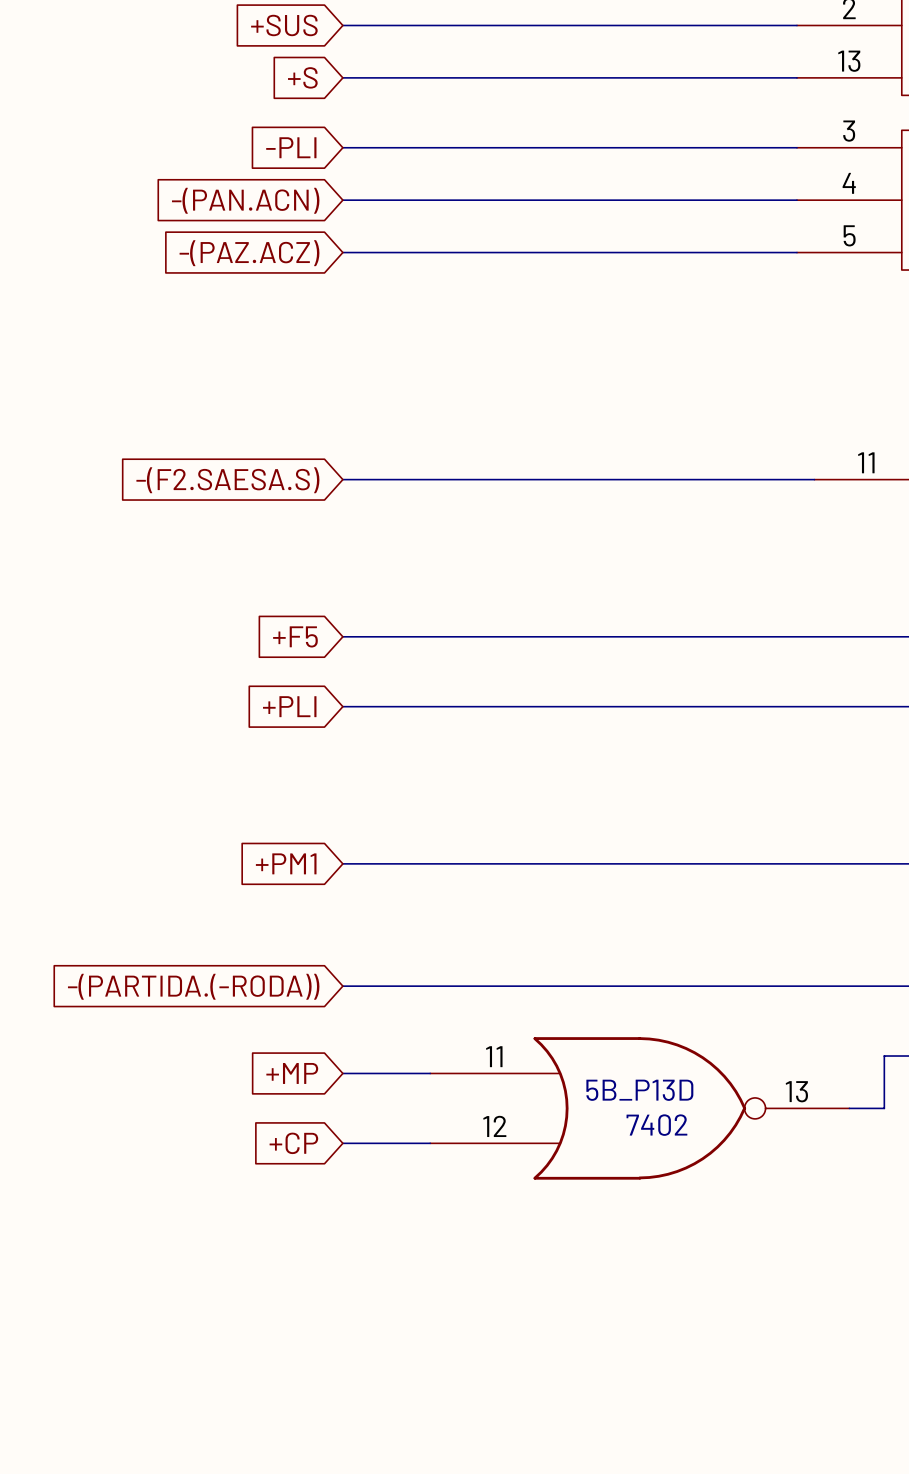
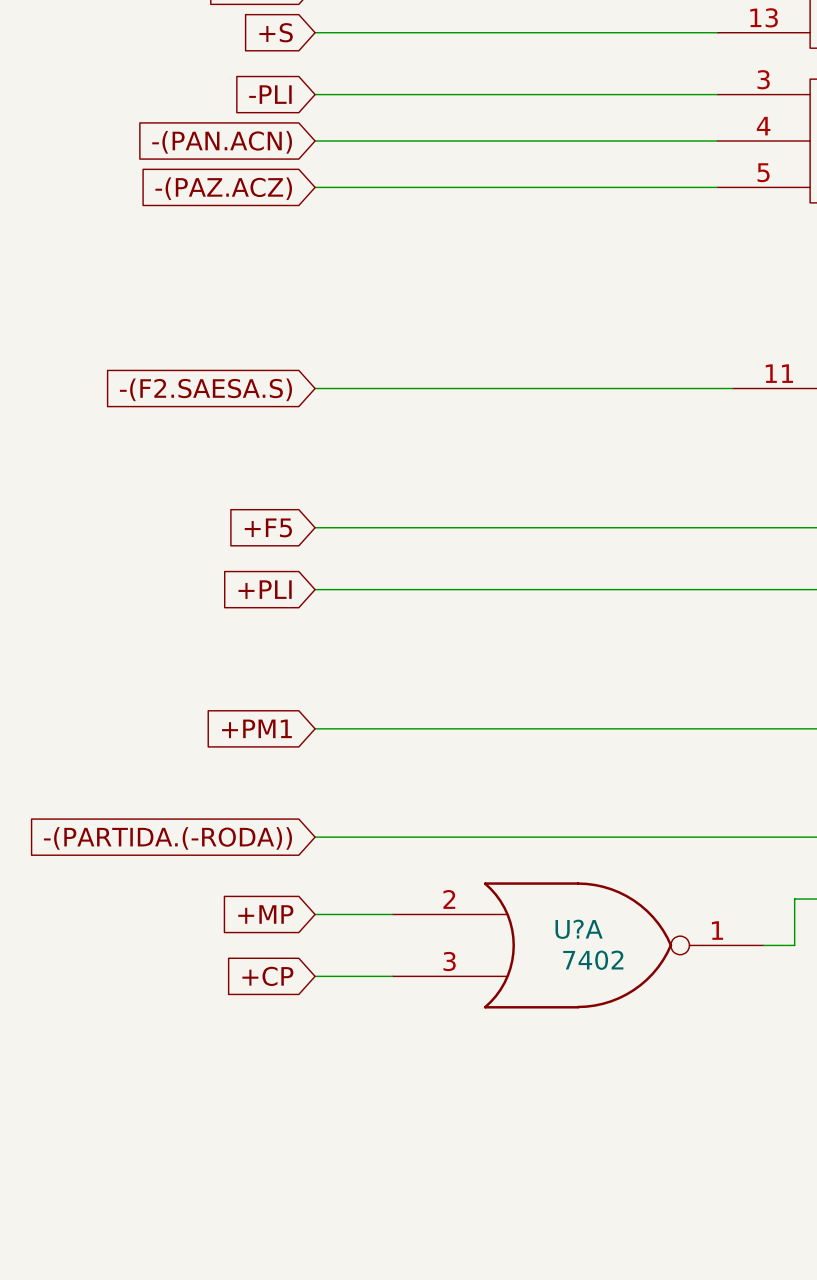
5B_P13D pin number: 11 (494, 1056) -> 2 (449, 899)
5B_P13D name: 5B_P13D (639, 1090) -> U?A (579, 929)
5B_P13D pin number: 13 (796, 1091) -> 1 (717, 930)
5B_P13D pin number: 12 (494, 1126) -> 3 (449, 961)

